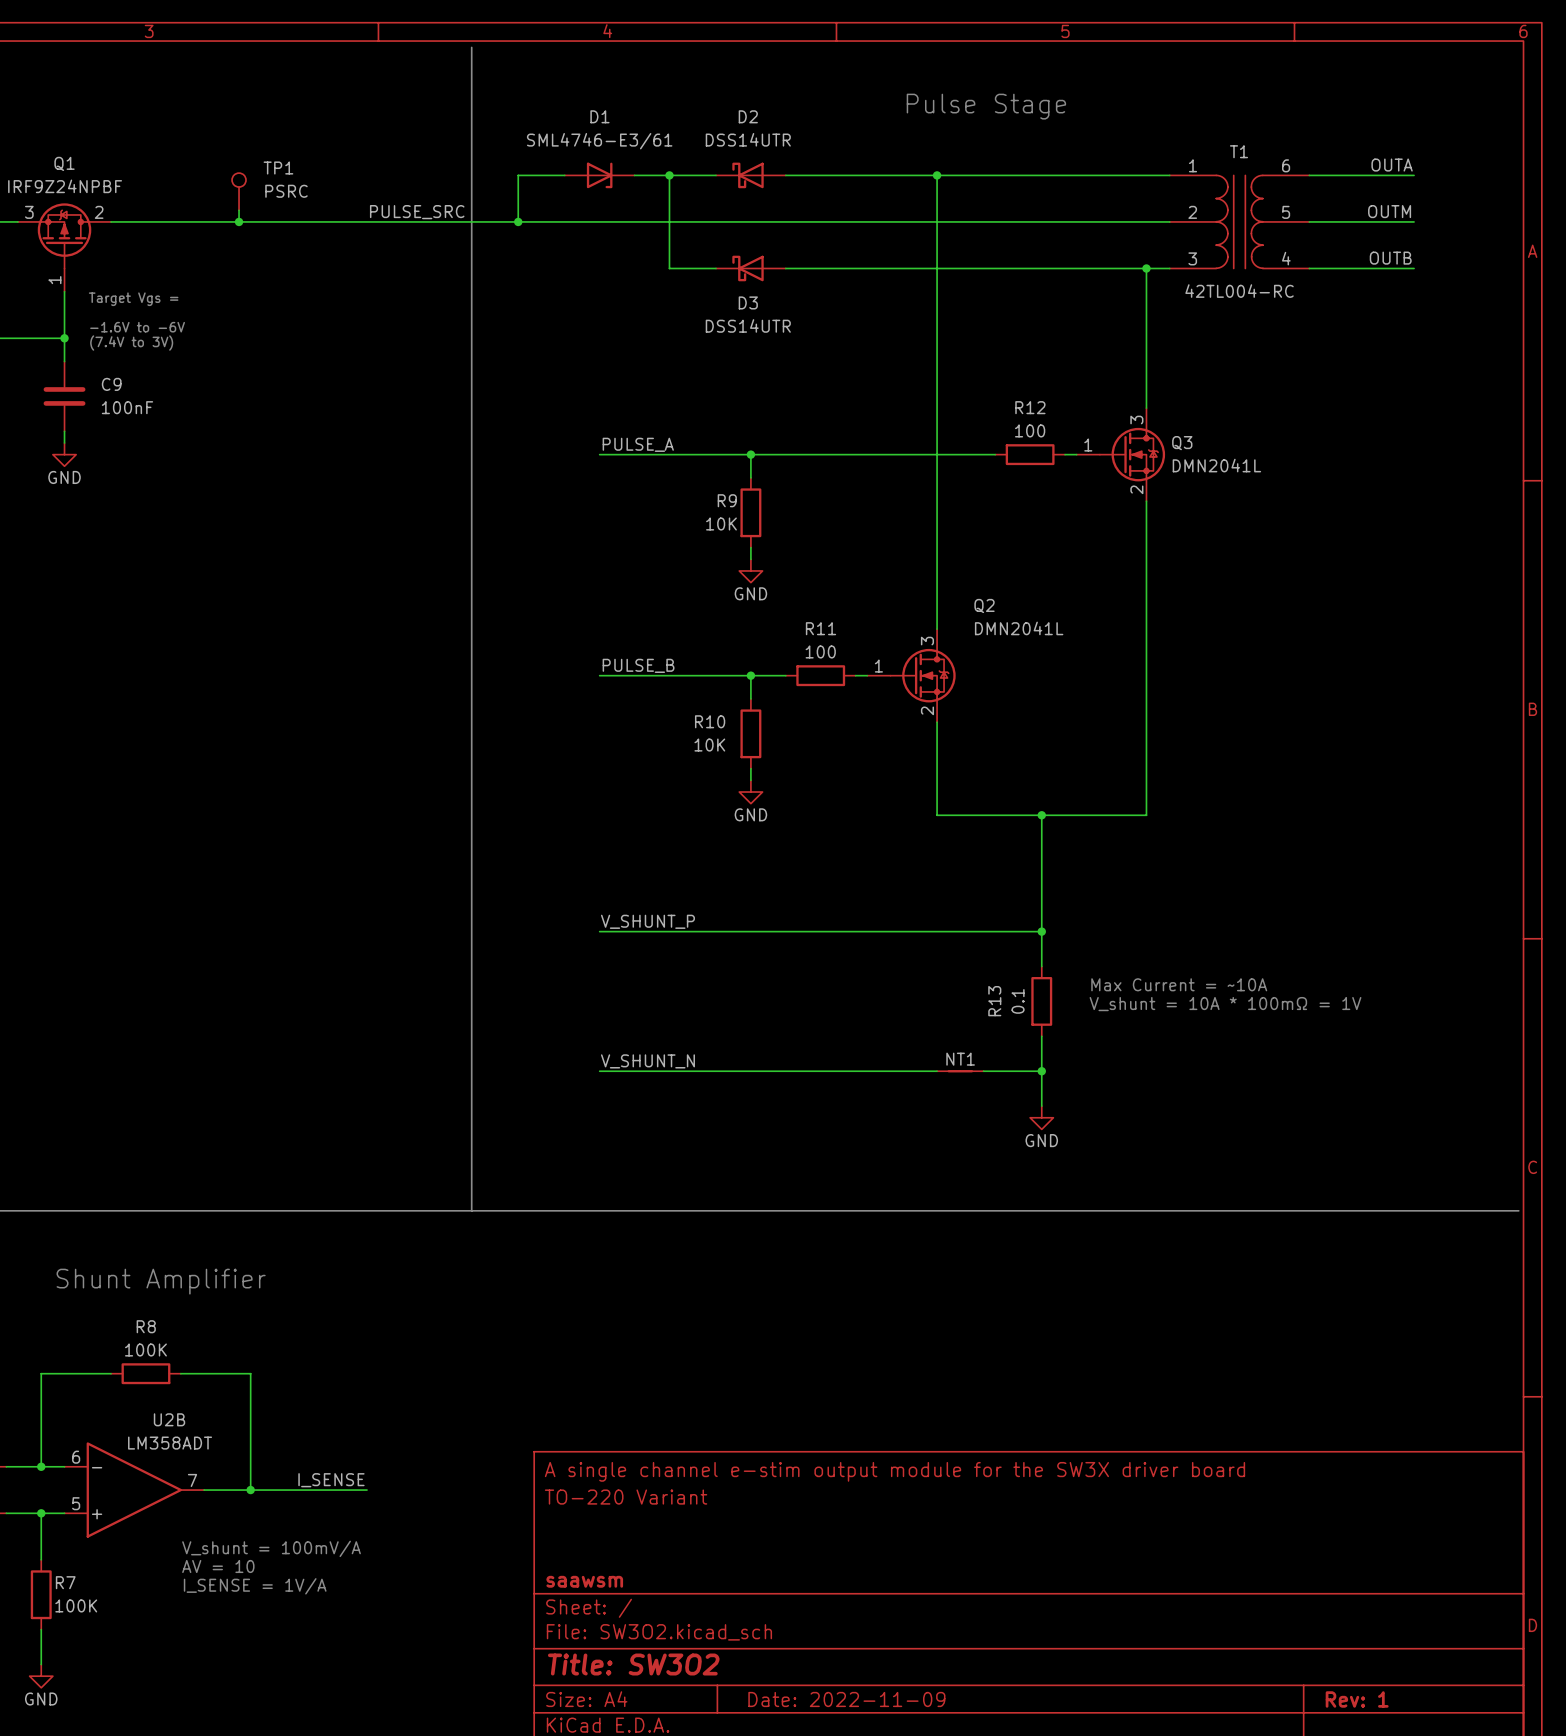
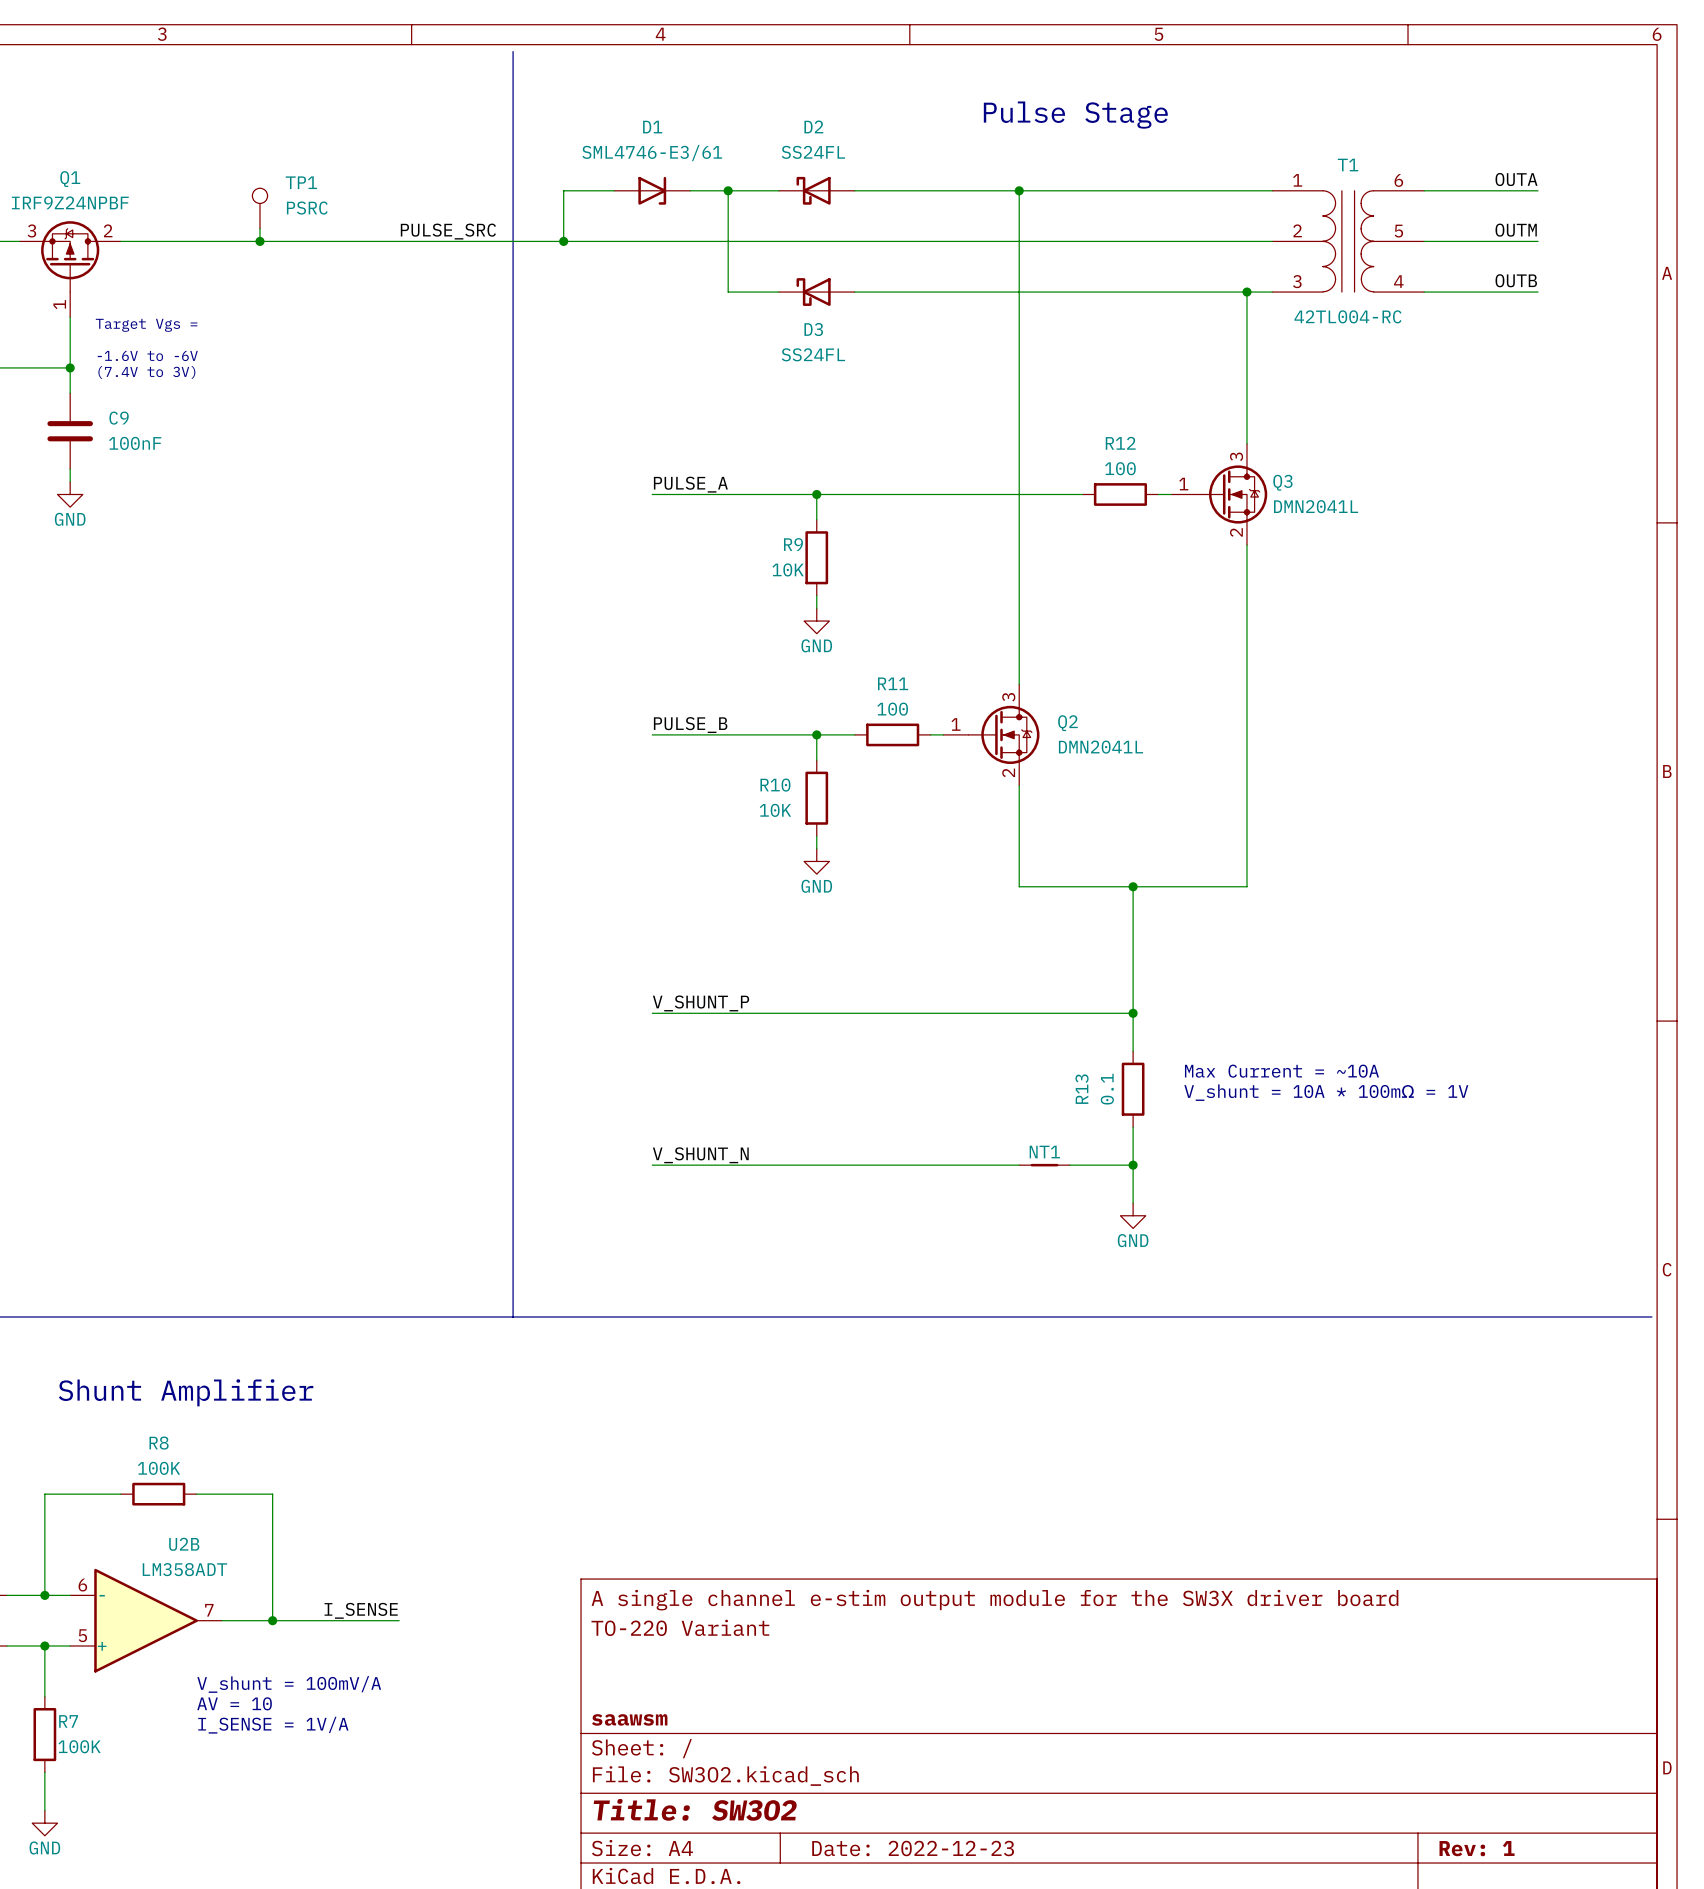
D2 value: DSS14UTR (748, 139) -> SS24FL (813, 152)
D3 value: DSS14UTR (748, 325) -> SS24FL (813, 354)
Q2 name position: Q2 (984, 605) -> Q2 (1068, 723)
Q2 value position: DMN2041L (1019, 628) -> DMN2041L (1100, 747)
title block: Date: 2022-11-09 (846, 1699) -> Date: 2022-12-23 (913, 1848)

